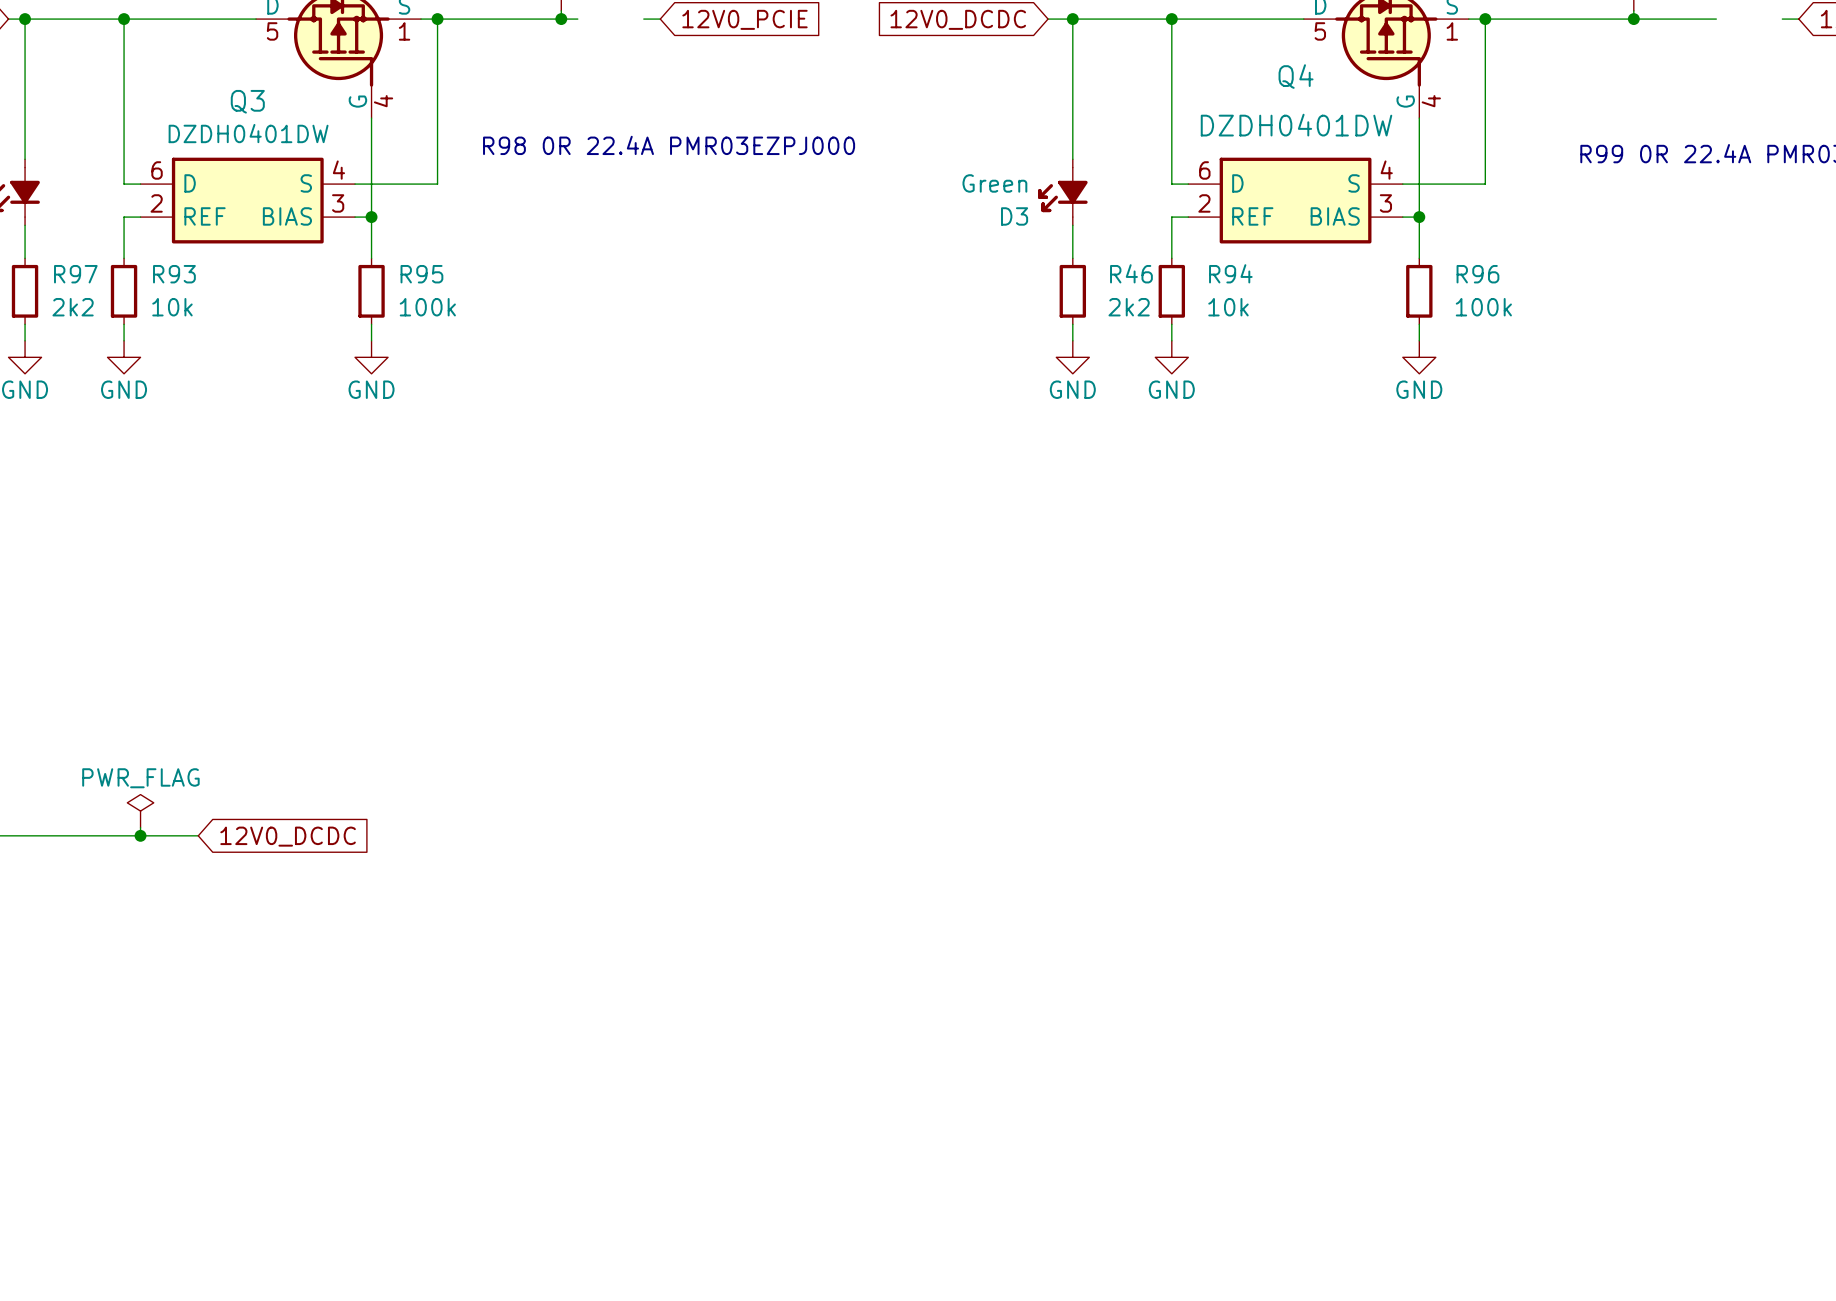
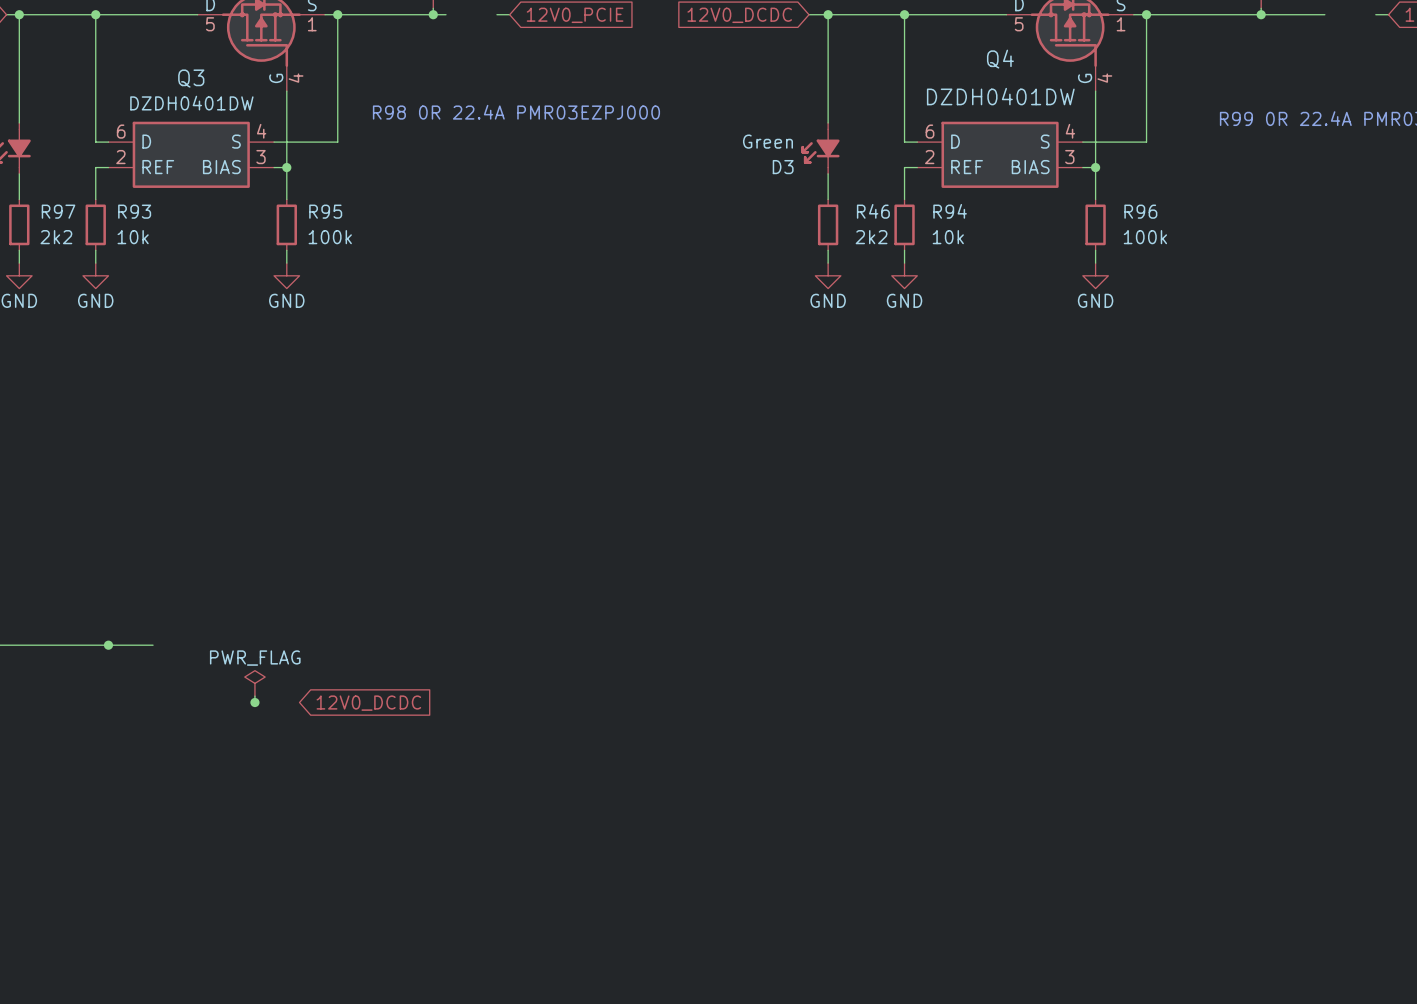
power symbol position: PWR_FLAG (140, 811) -> PWR_FLAG (254, 683)
global label position: 12V0_DCDC (288, 836) -> 12V0_DCDC (368, 703)
junction: none -> (254, 702)

